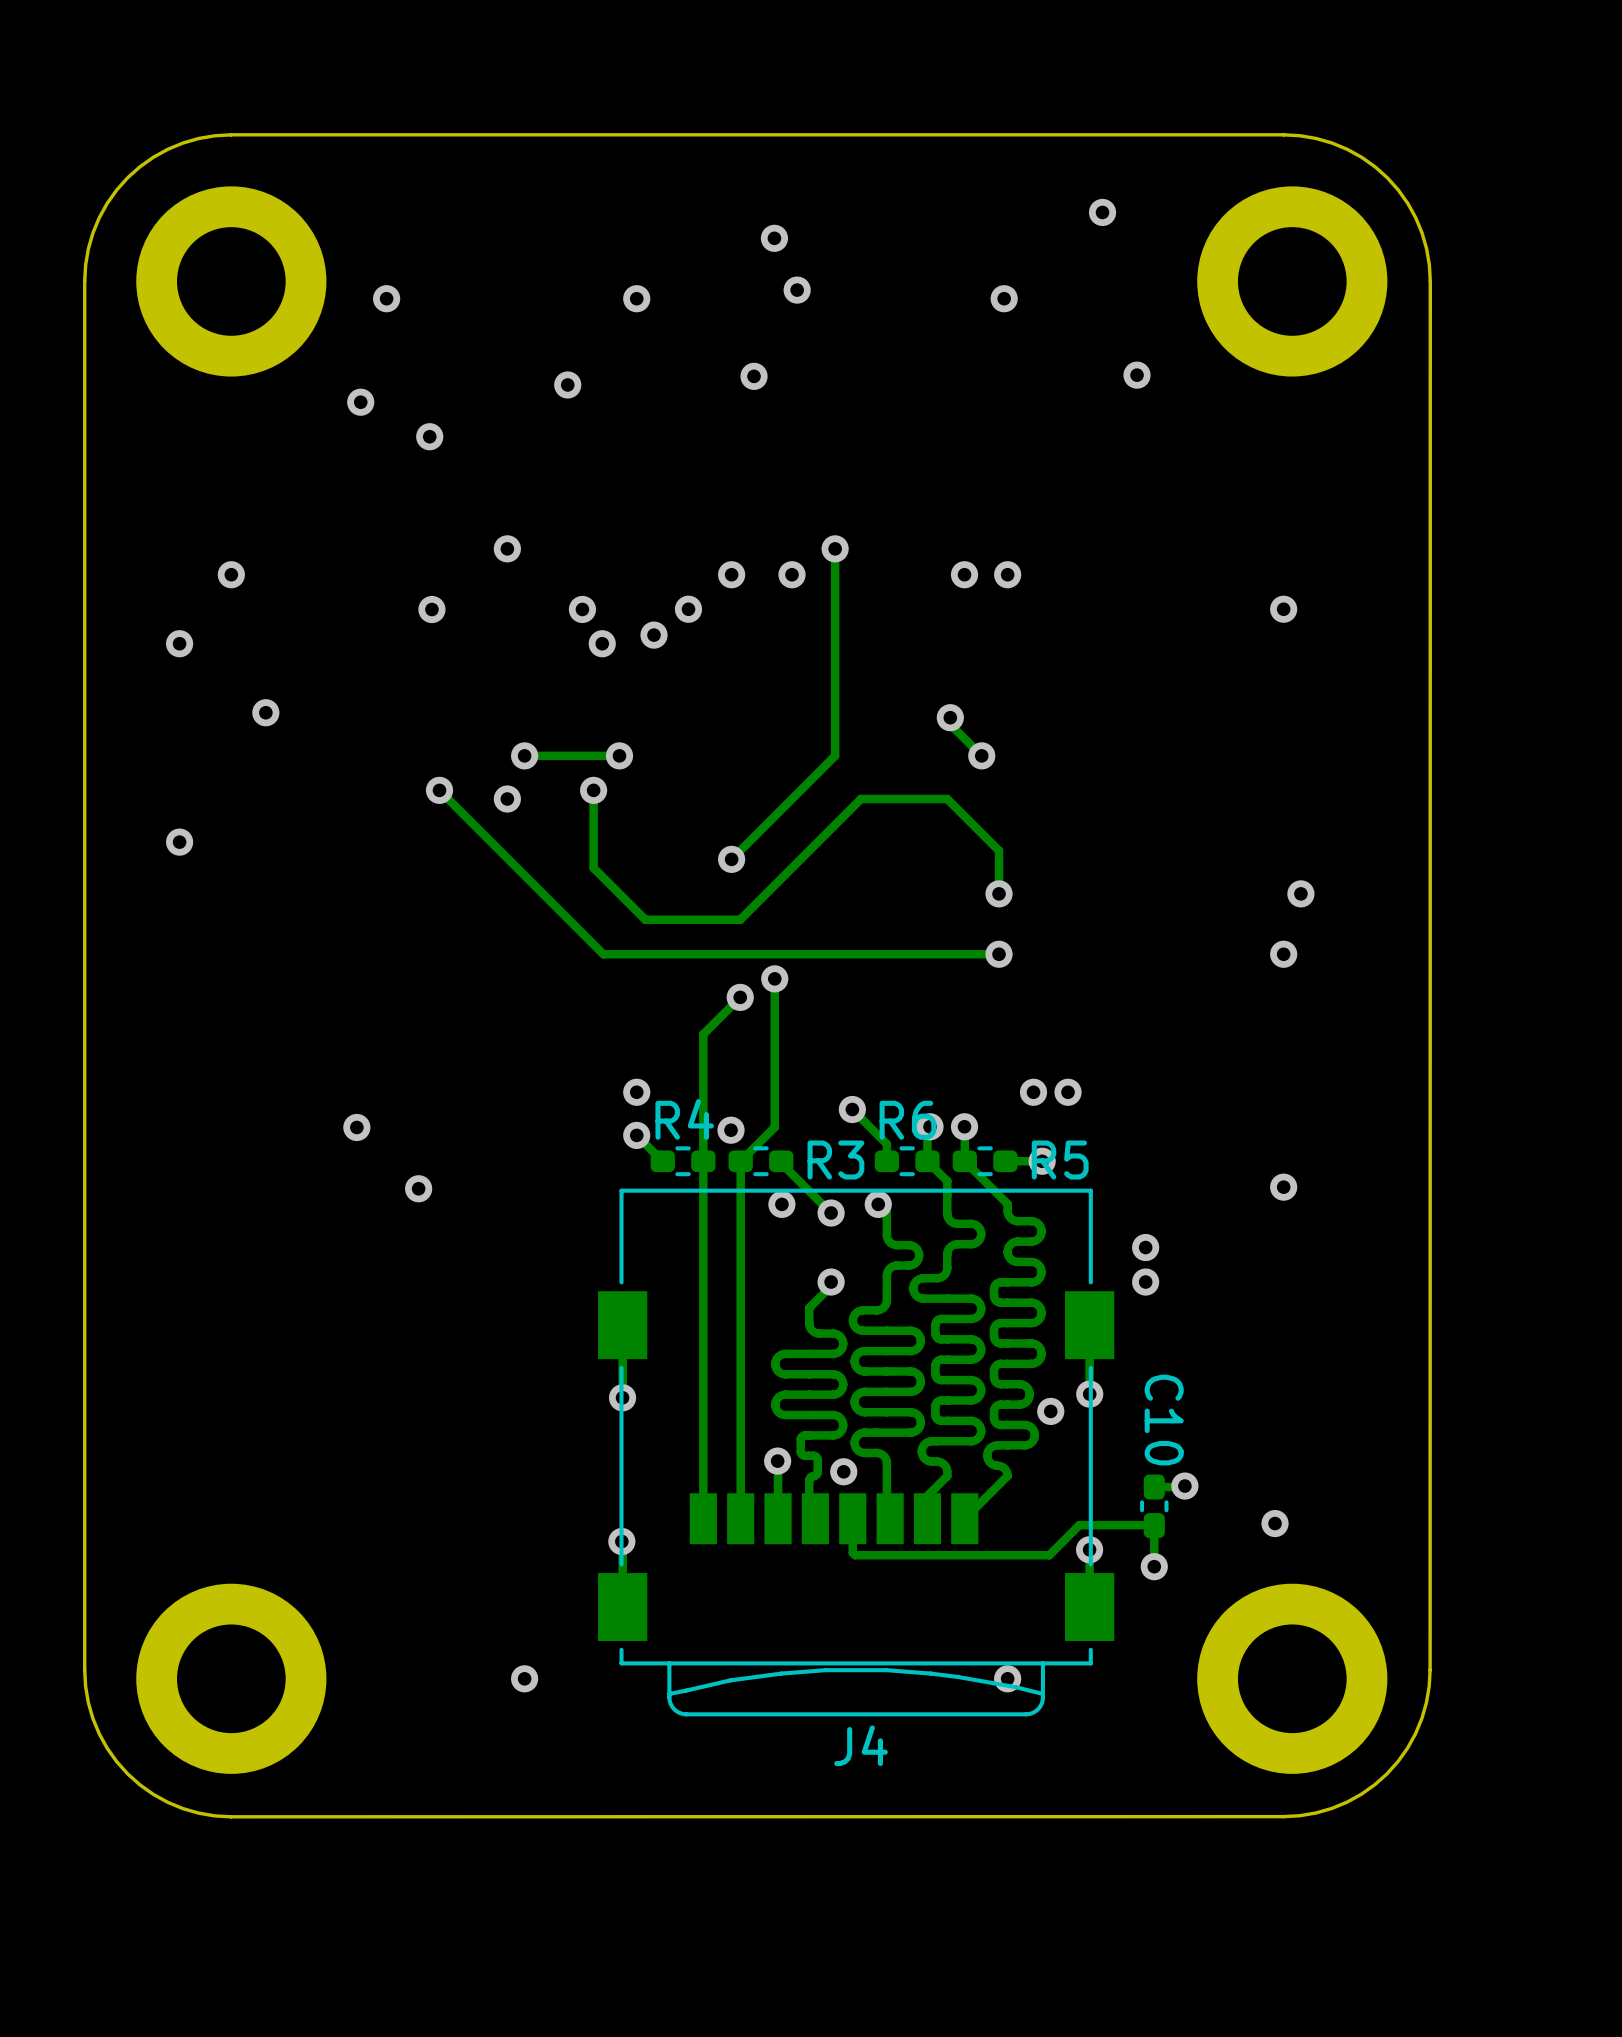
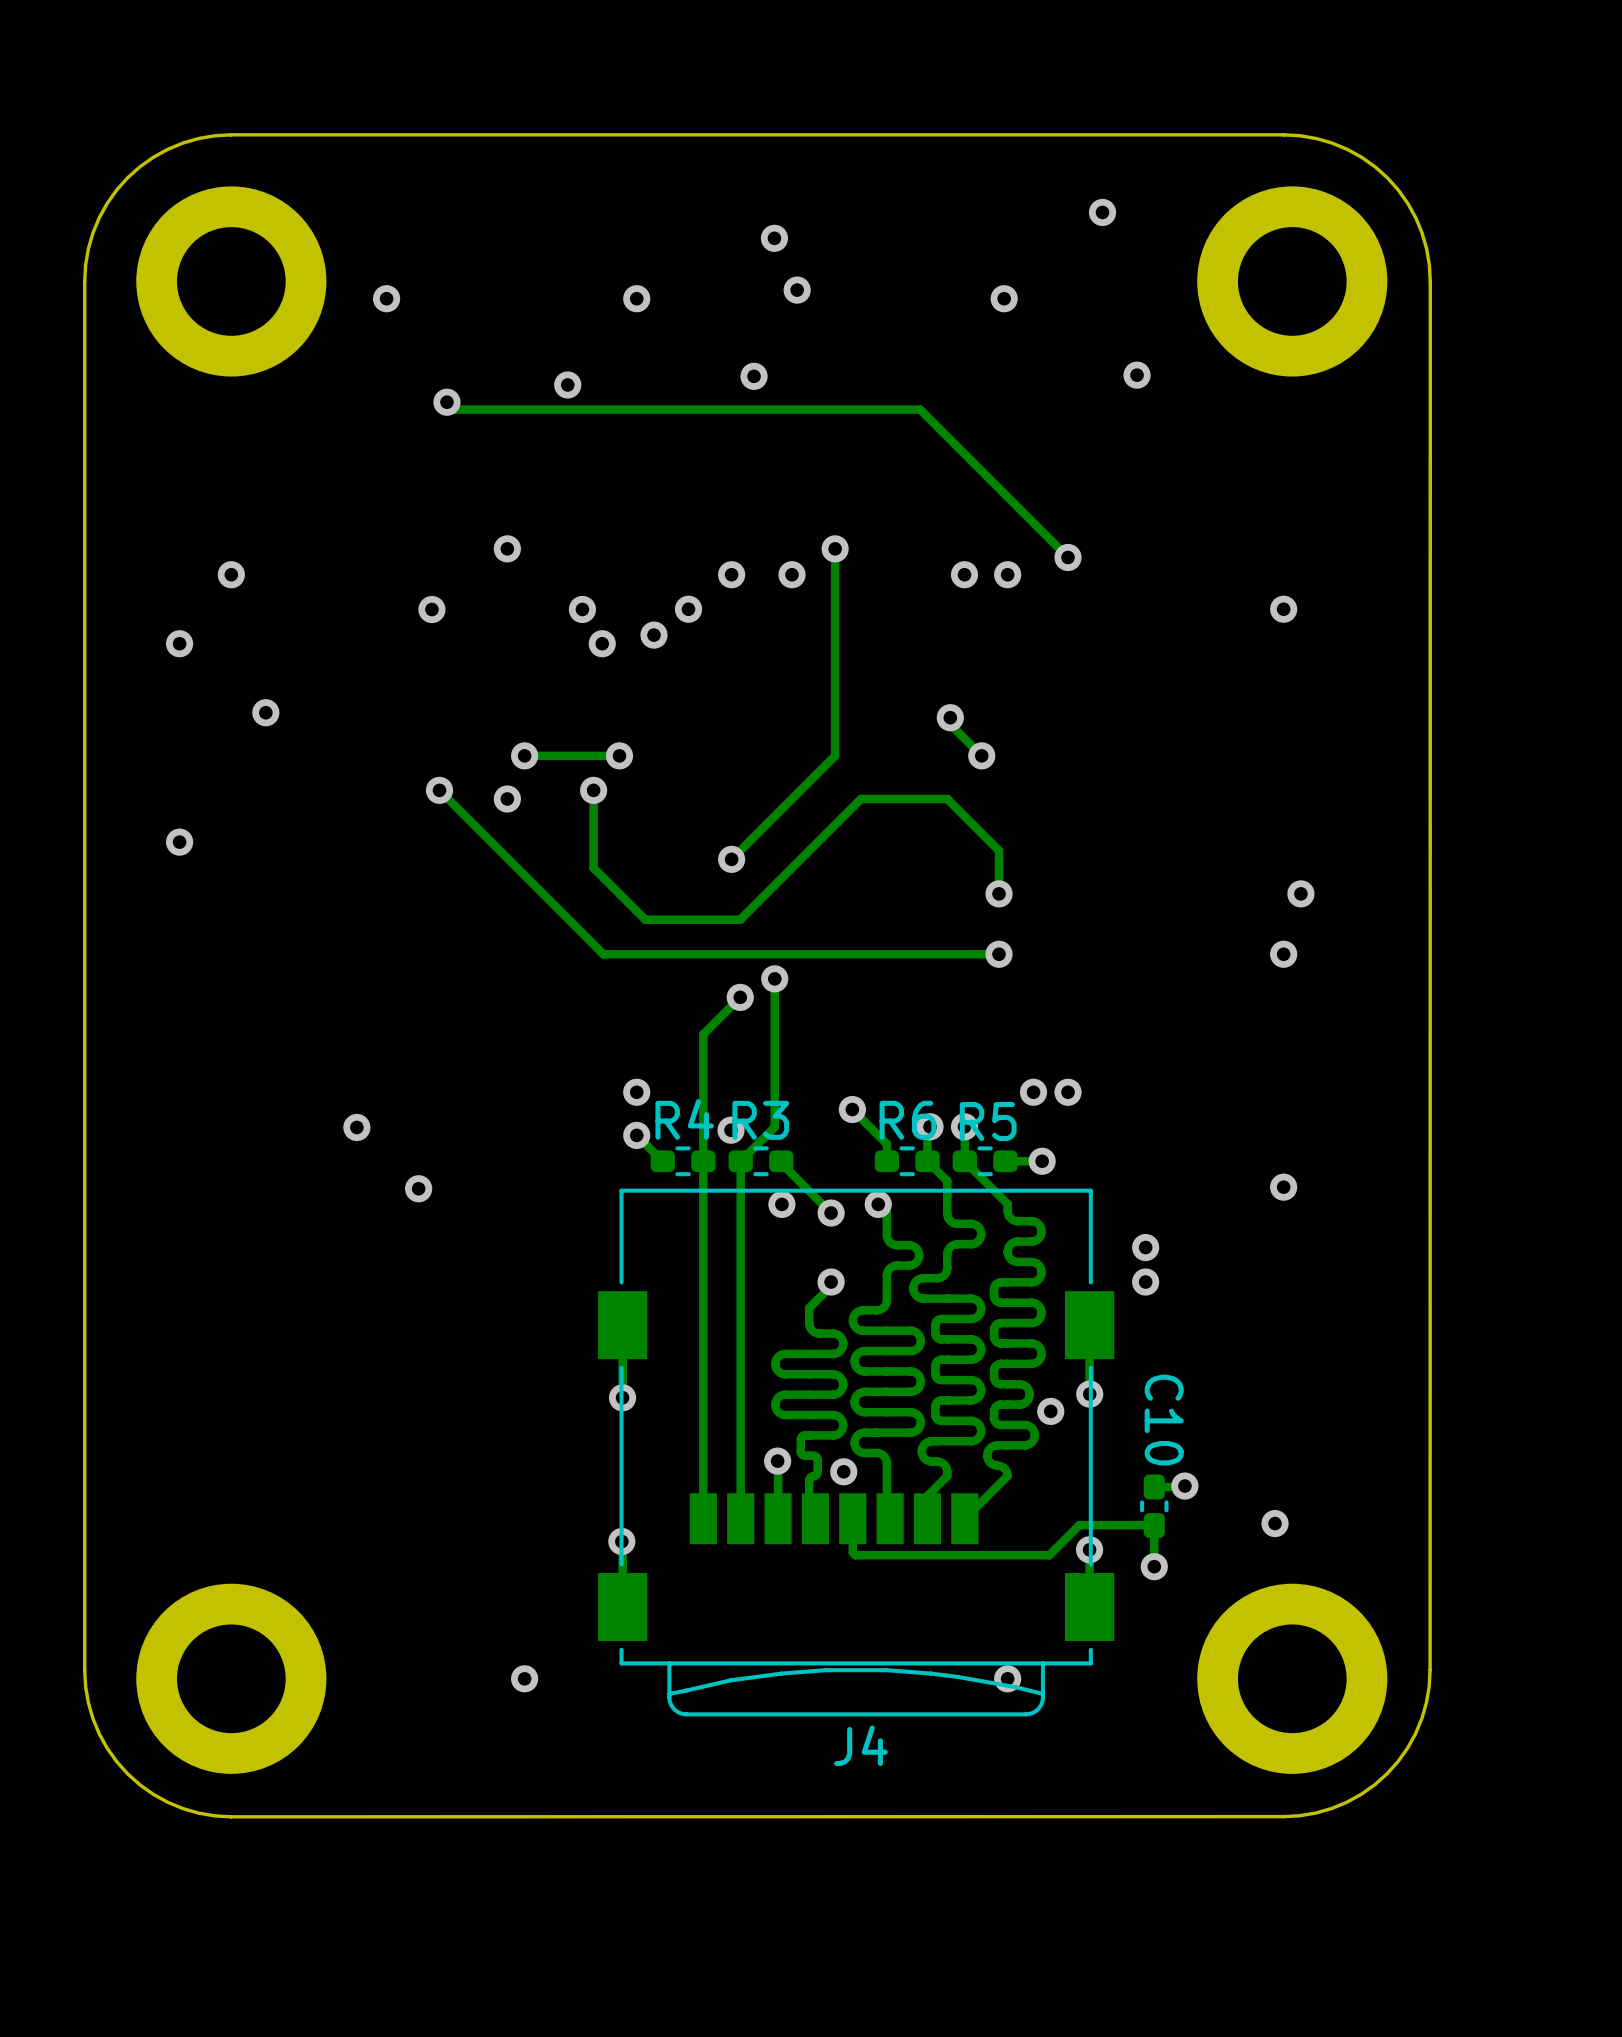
via: (360, 402) -> none
track: none -> (446, 402) (454, 409) (920, 409) (1068, 557)
via position: (429, 436) -> (446, 402)
via: none -> (1068, 557)
R3 name position: R3 (835, 1160) -> R3 (760, 1120)
R5 name position: R5 (1060, 1160) -> R5 (988, 1121)

